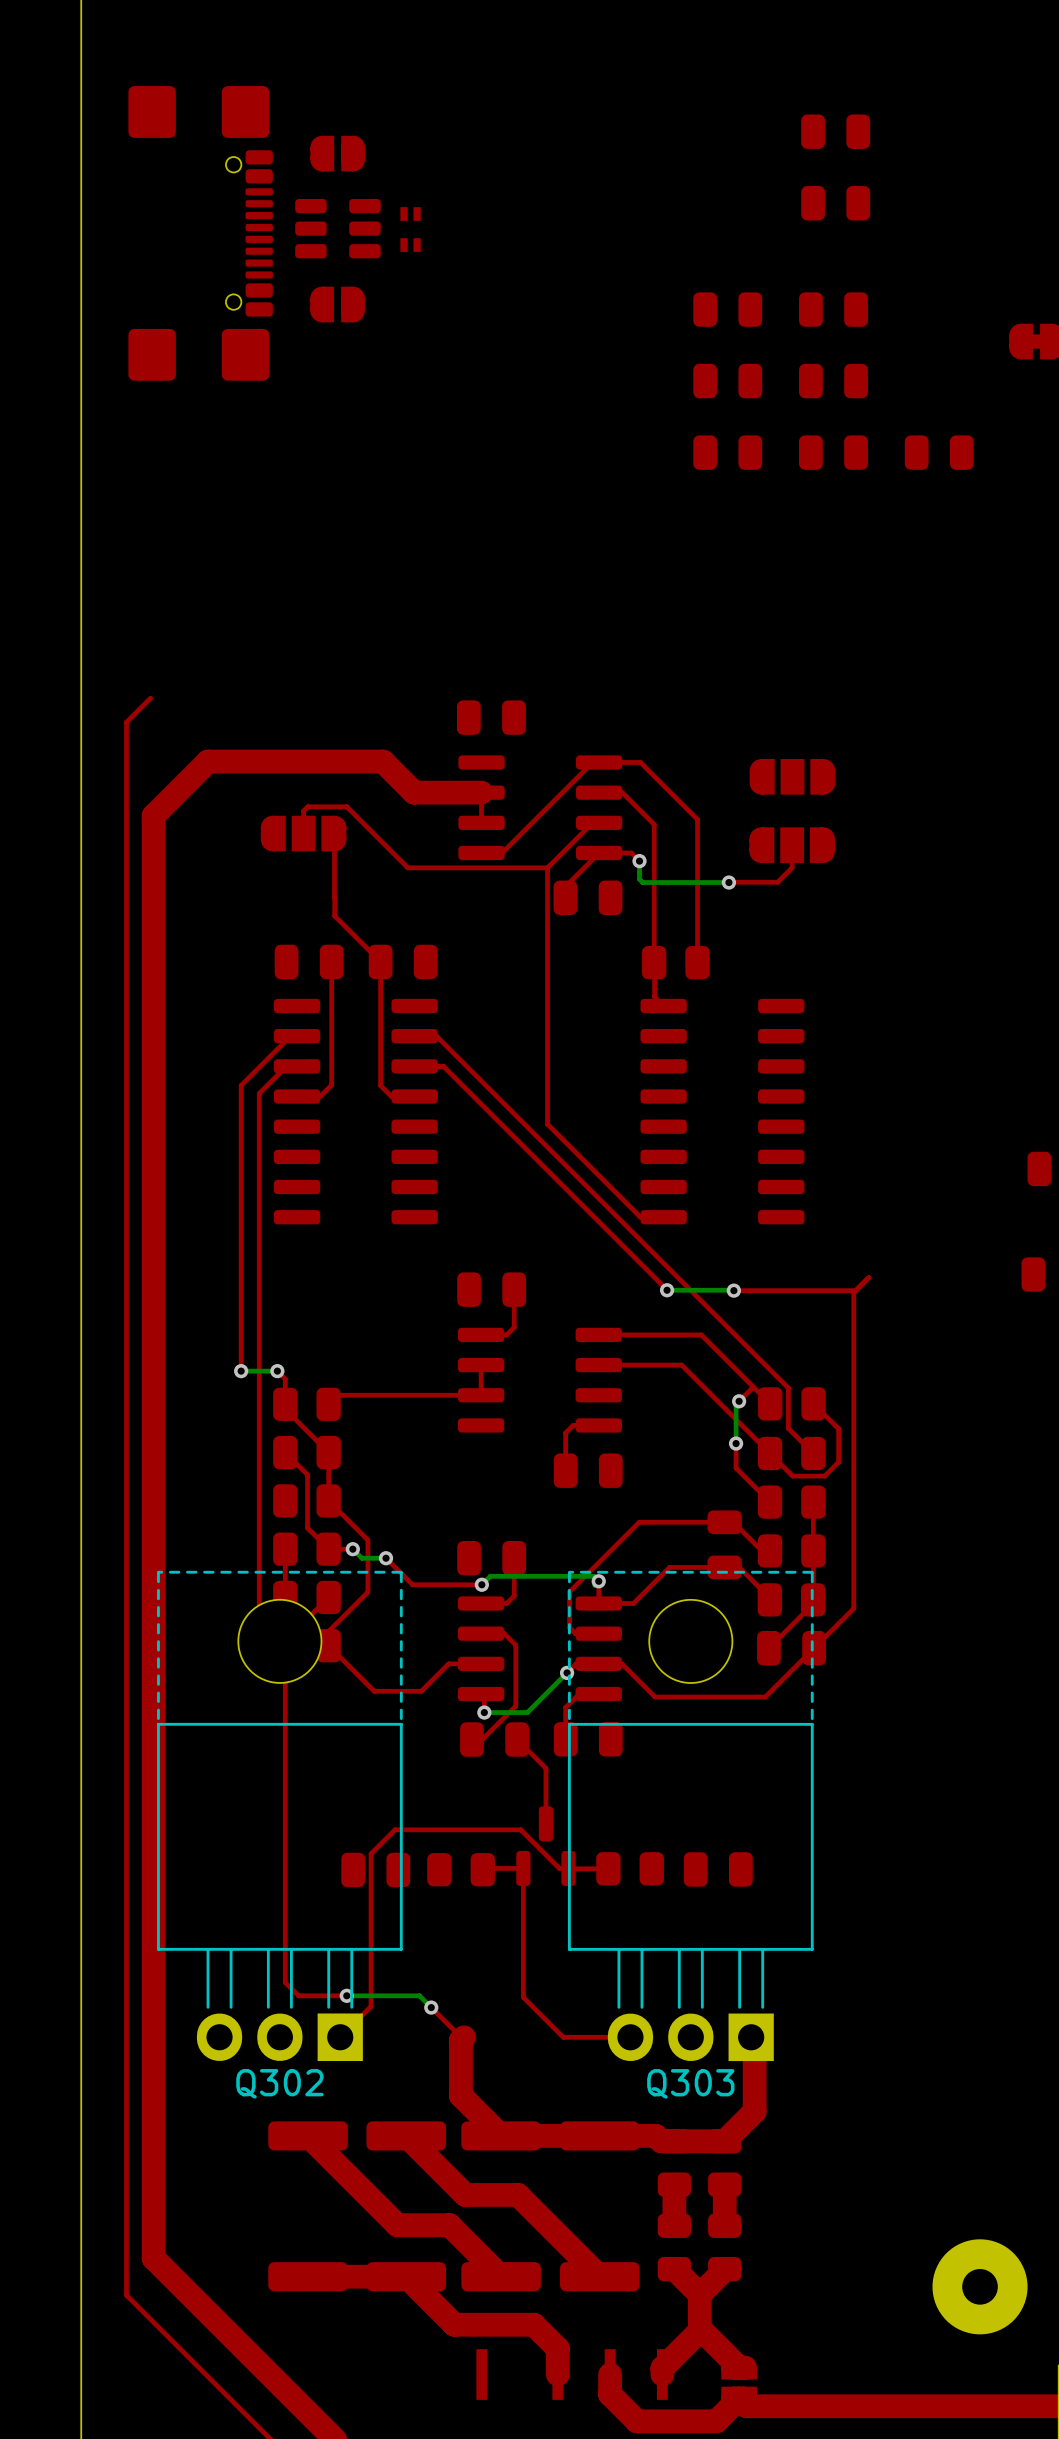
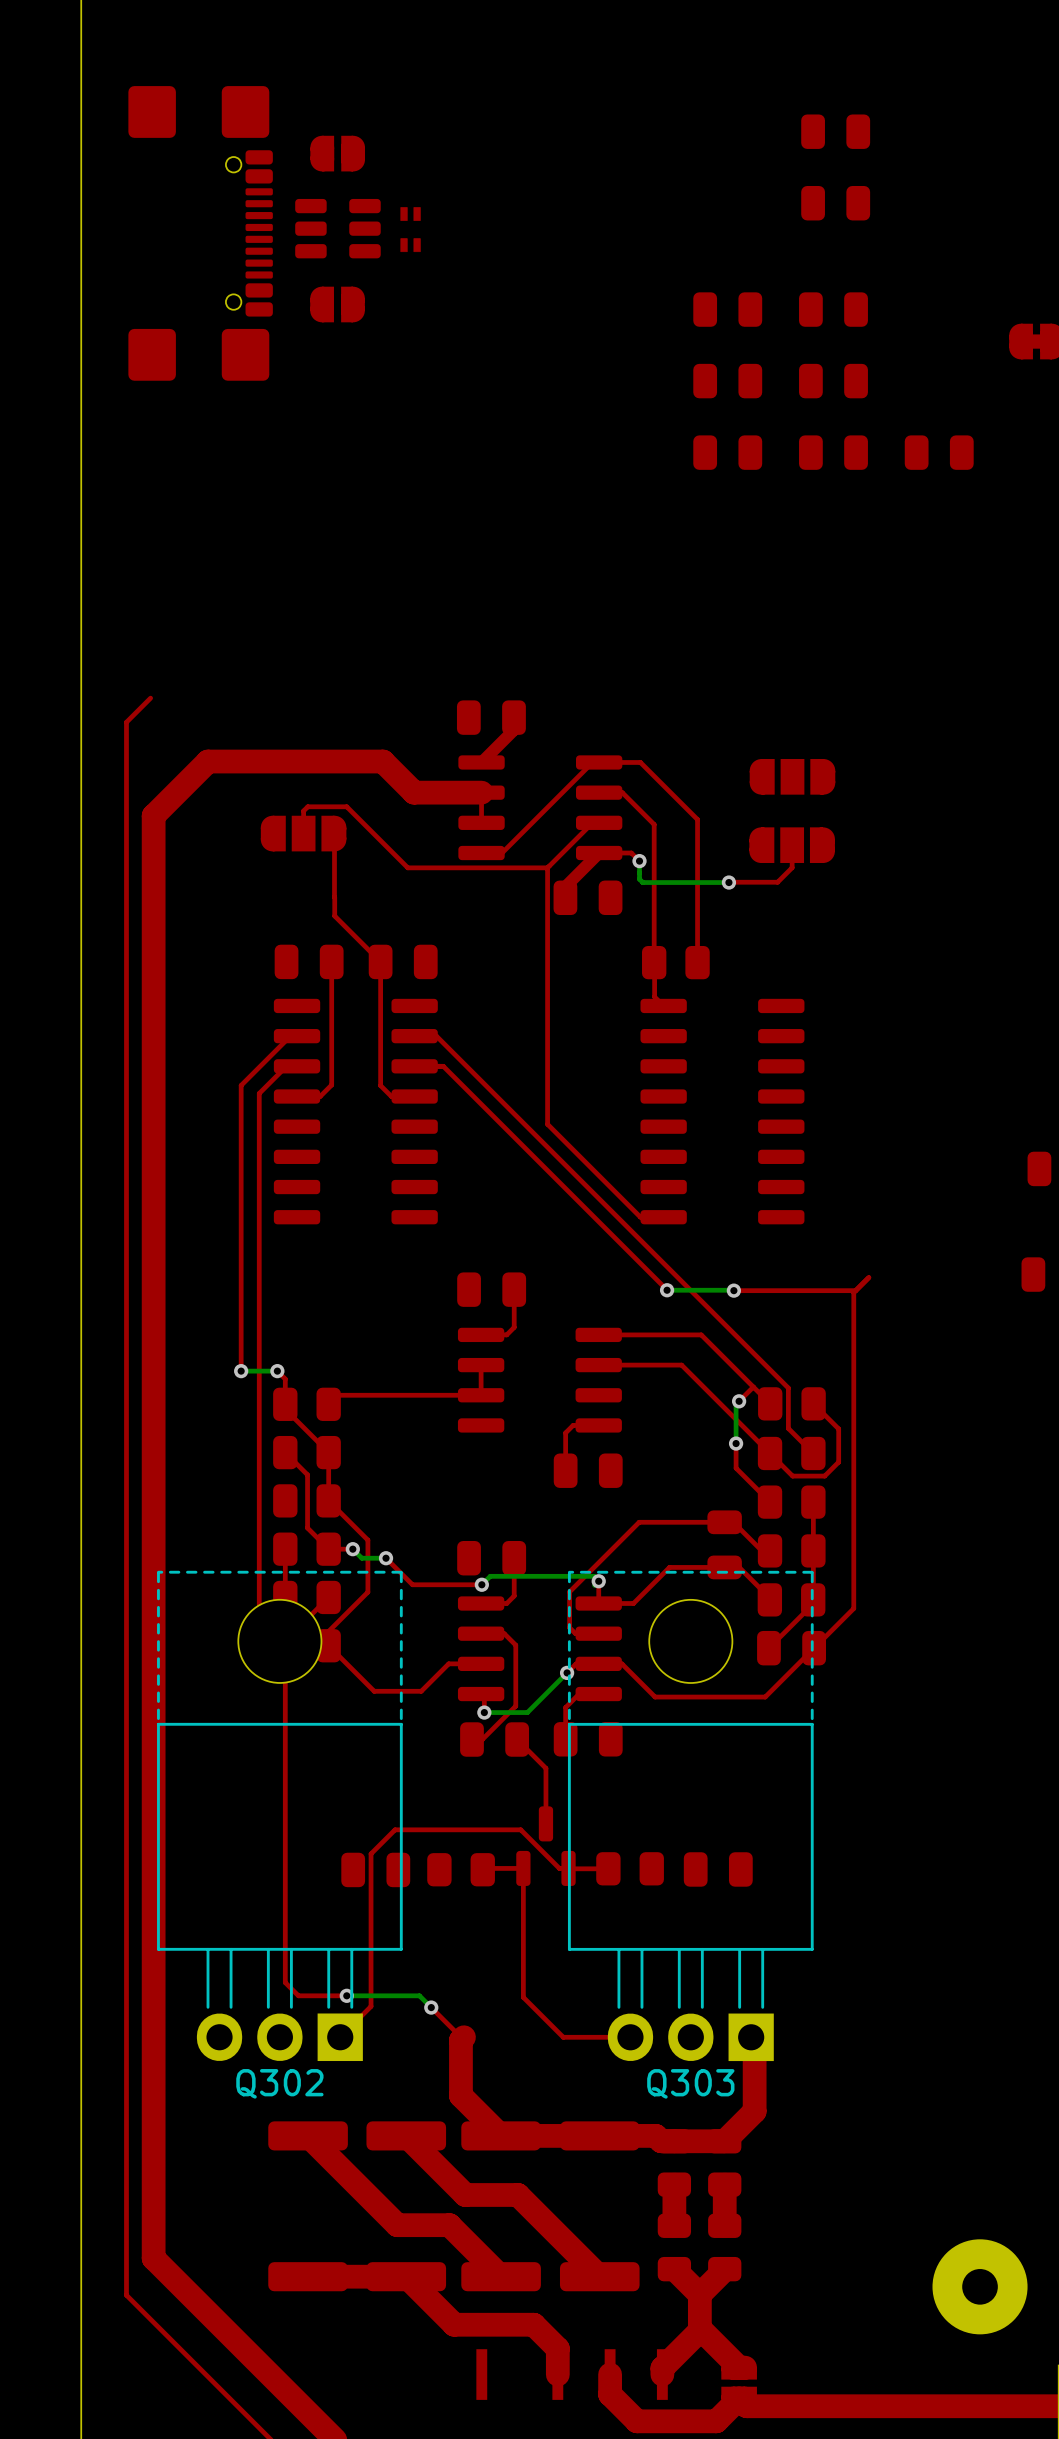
top track: none -> (514, 717) (514, 730) (481, 762)
top track width: thin (599, 853) (565, 886) (565, 897) -> thick (599, 853) (565, 886) (565, 897)

